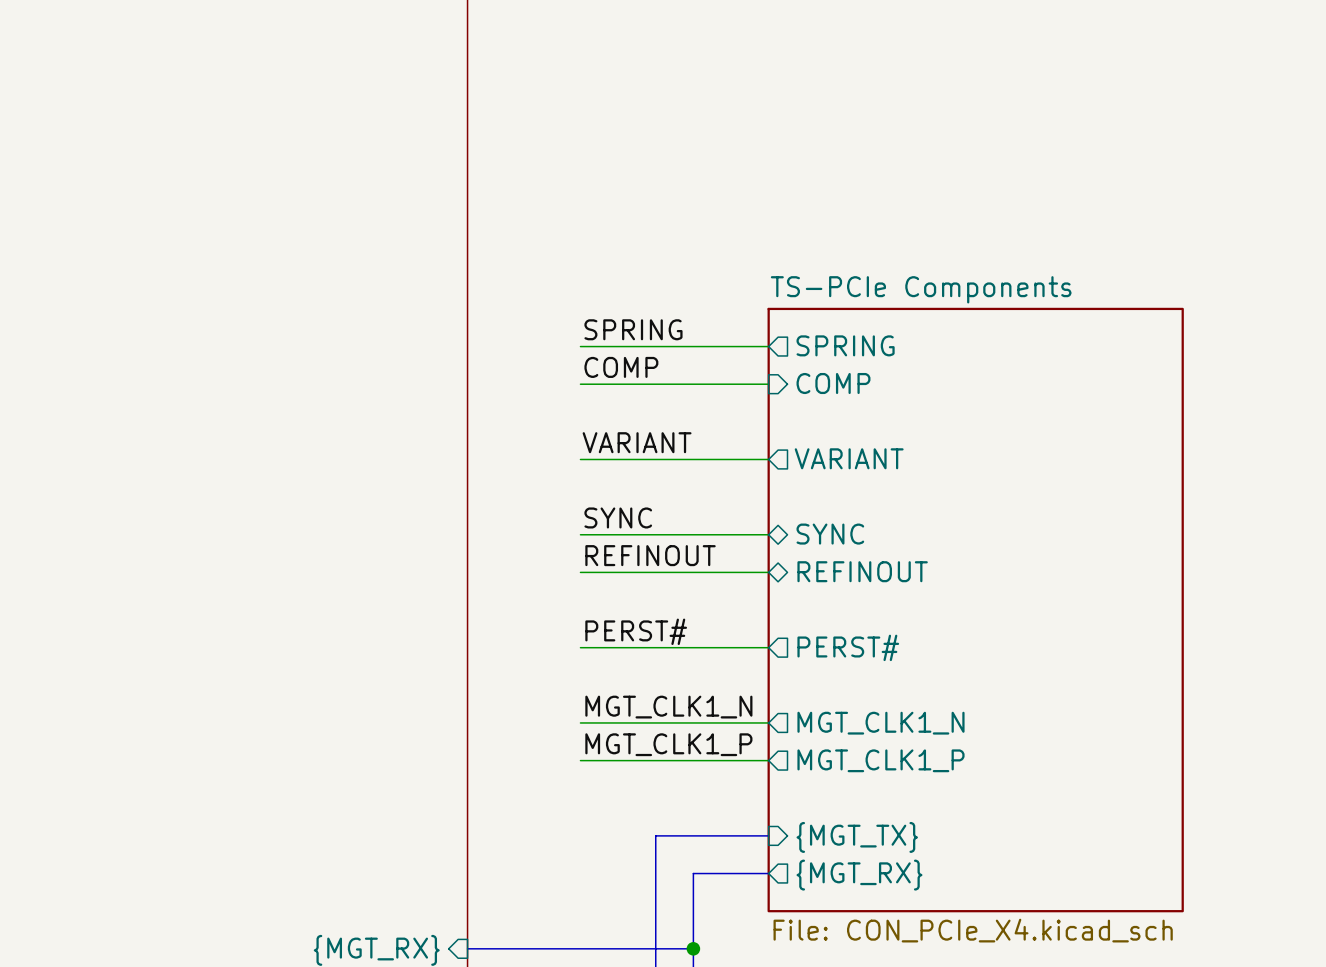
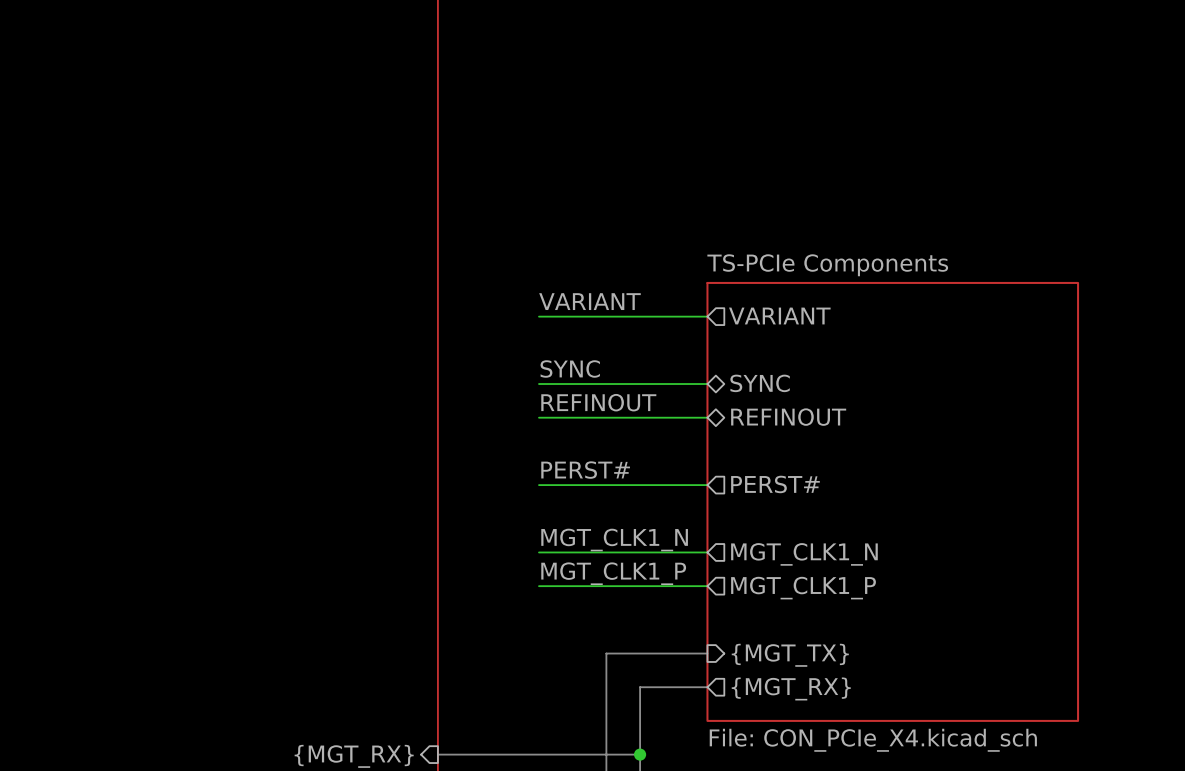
label: SPRING (633, 329) -> none
sheet pin: SPRING (845, 345) -> none
wire: (580, 346) (768, 346) -> none
label: COMP (621, 367) -> none
sheet pin: COMP (833, 383) -> none
wire: (580, 384) (768, 384) -> none
sheet TS-PCIe Components: File: CON_PCIe_X4.kicad_sch (975, 610) -> none
sheet TS-PCIe Components: none -> File: CON_PCIe_X4.kicad_sch (892, 501)

